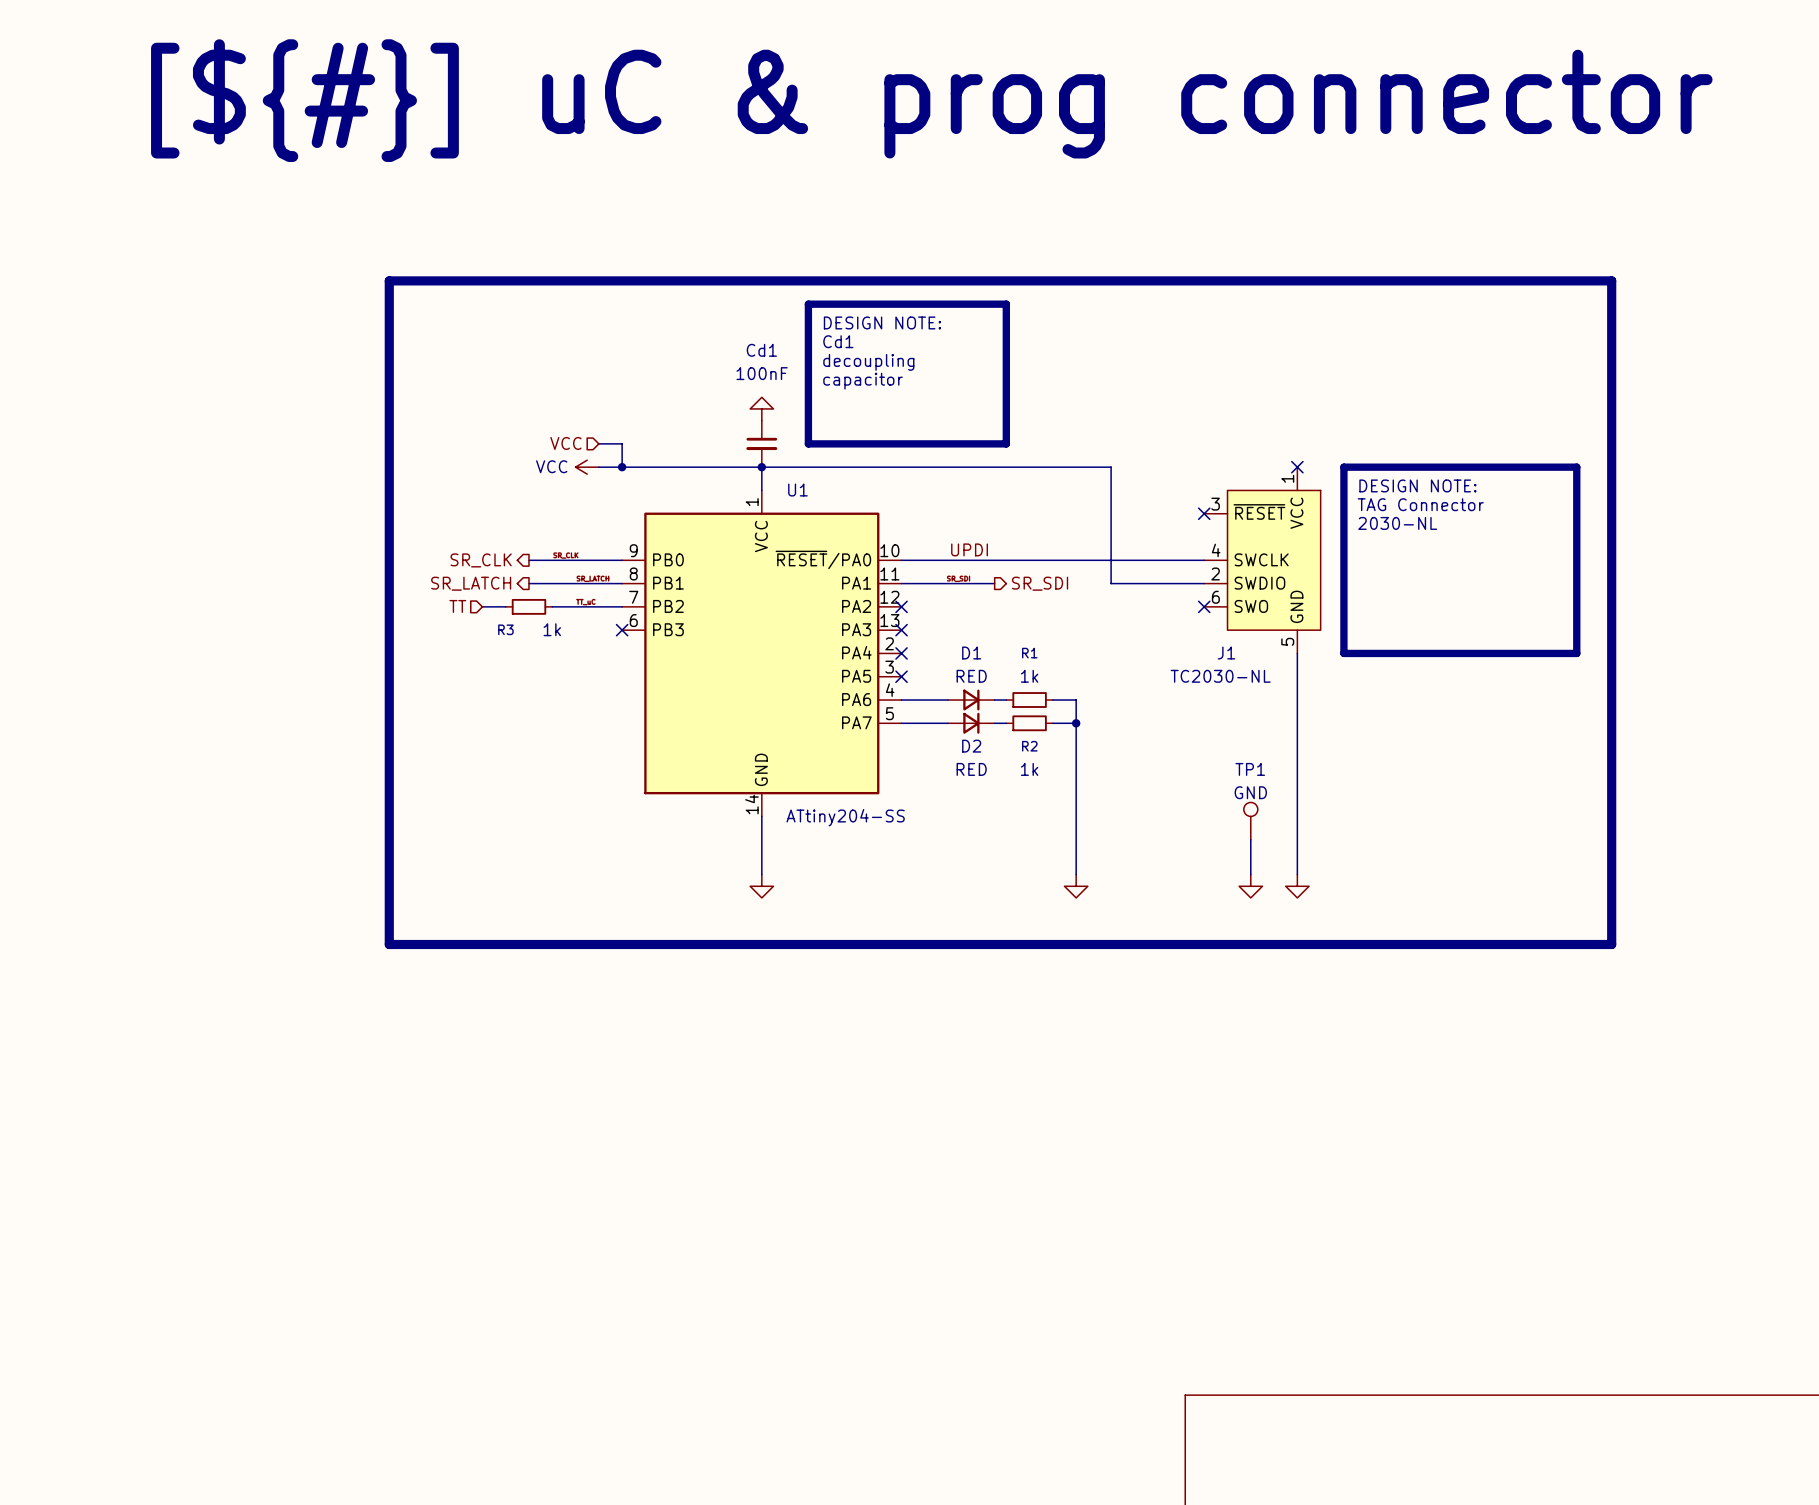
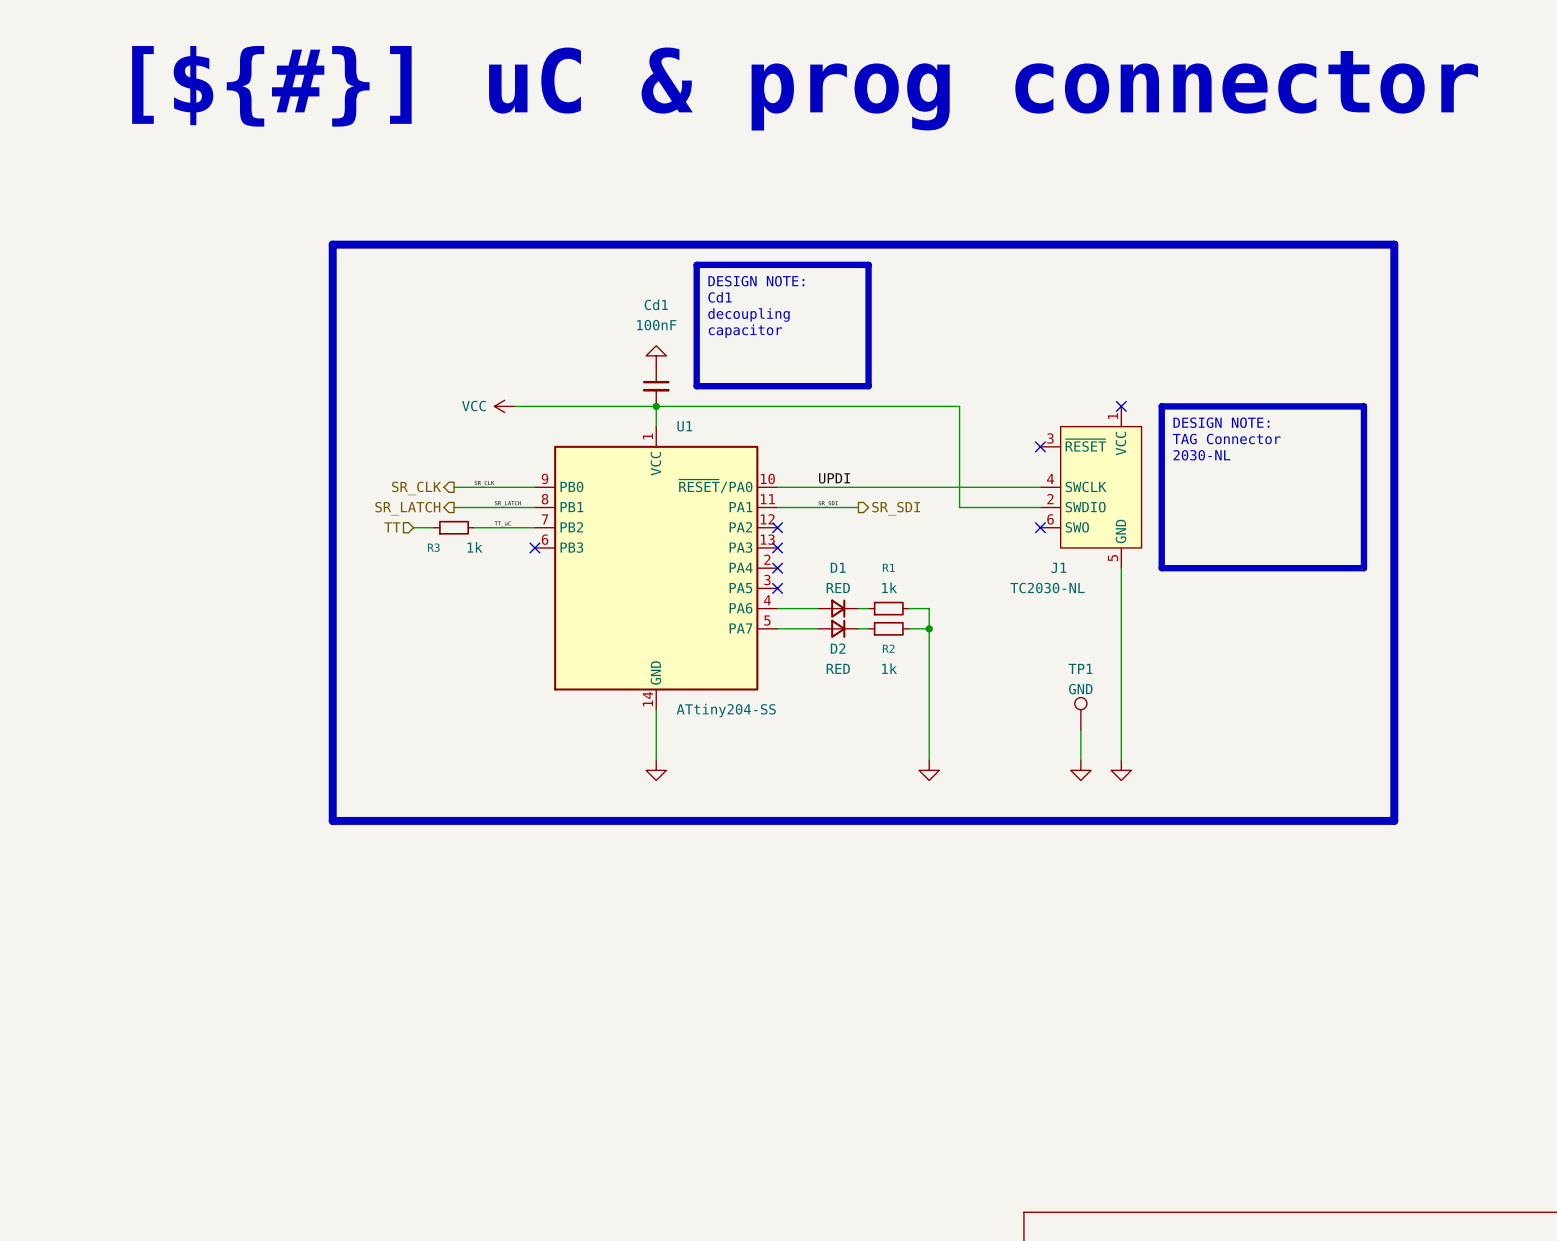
hierarchical label: VCC (565, 443) -> none
wire: (598, 443) (622, 443) (622, 467) -> none
junction: (622, 467) -> none

